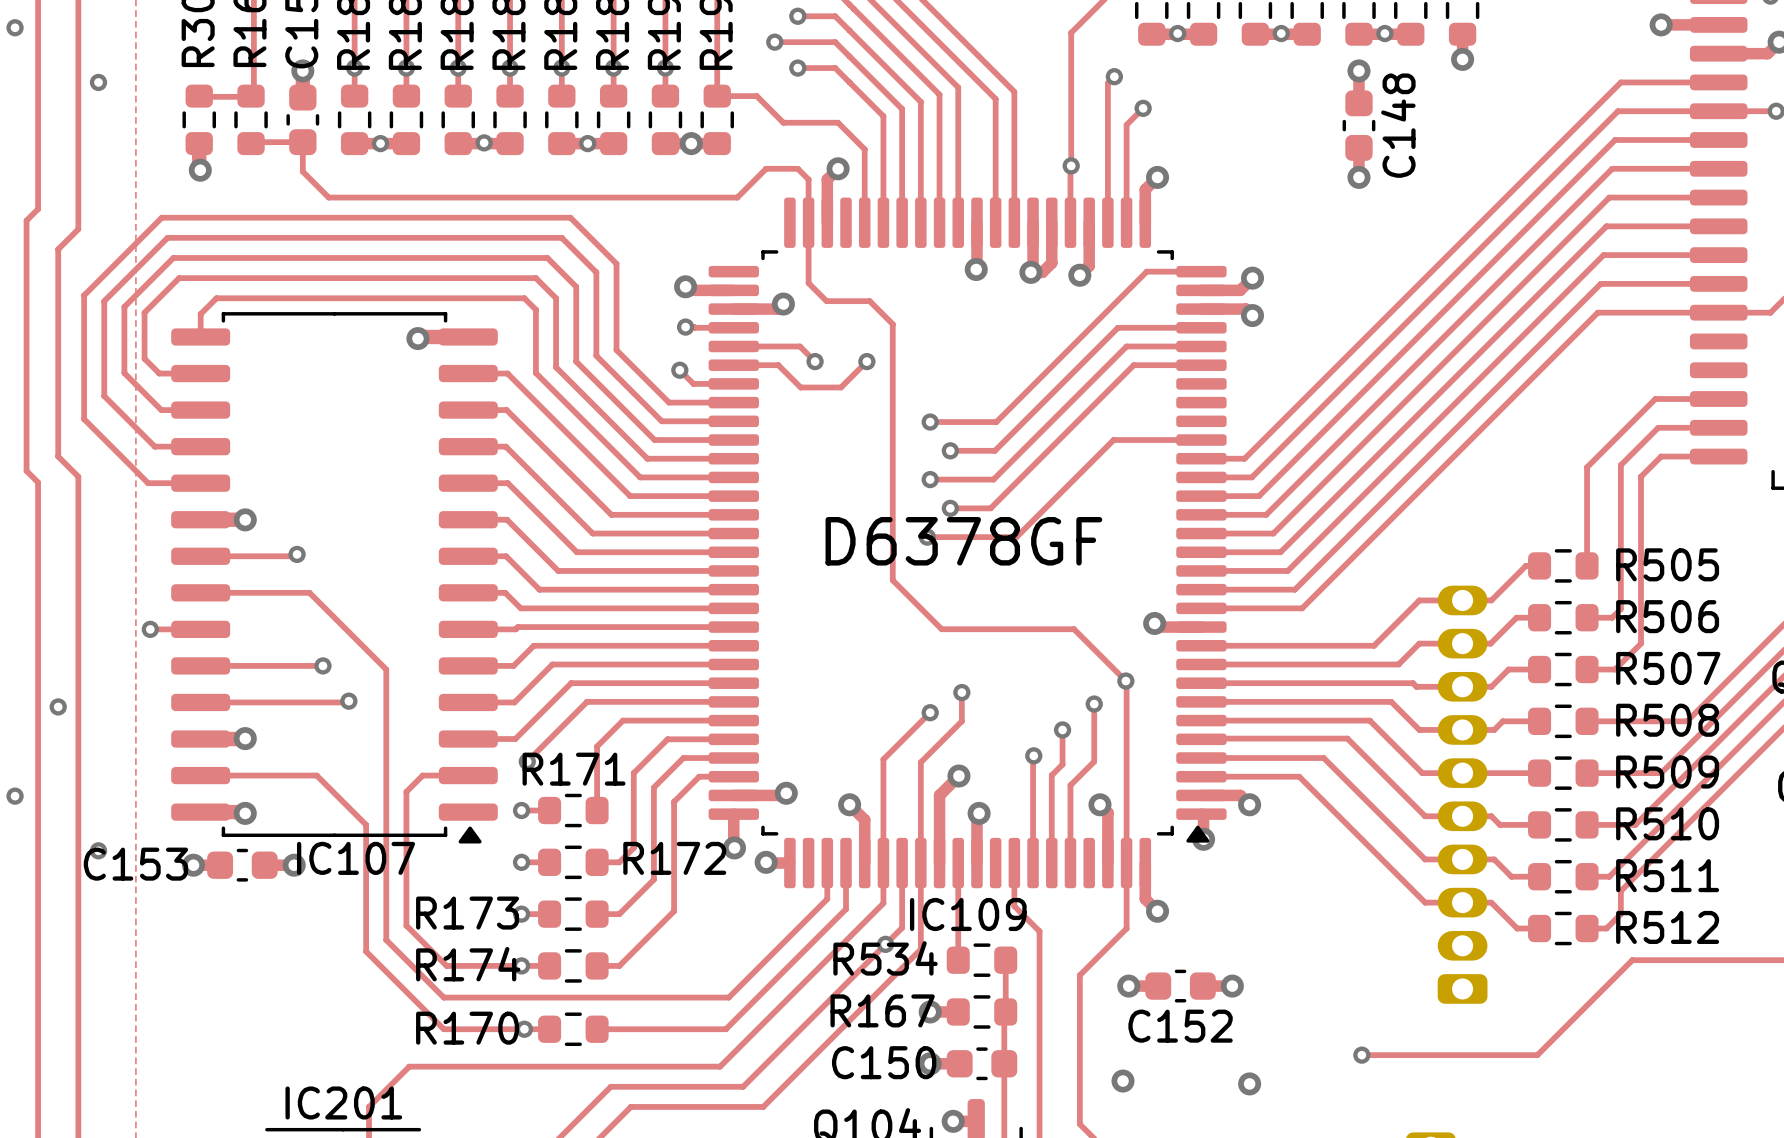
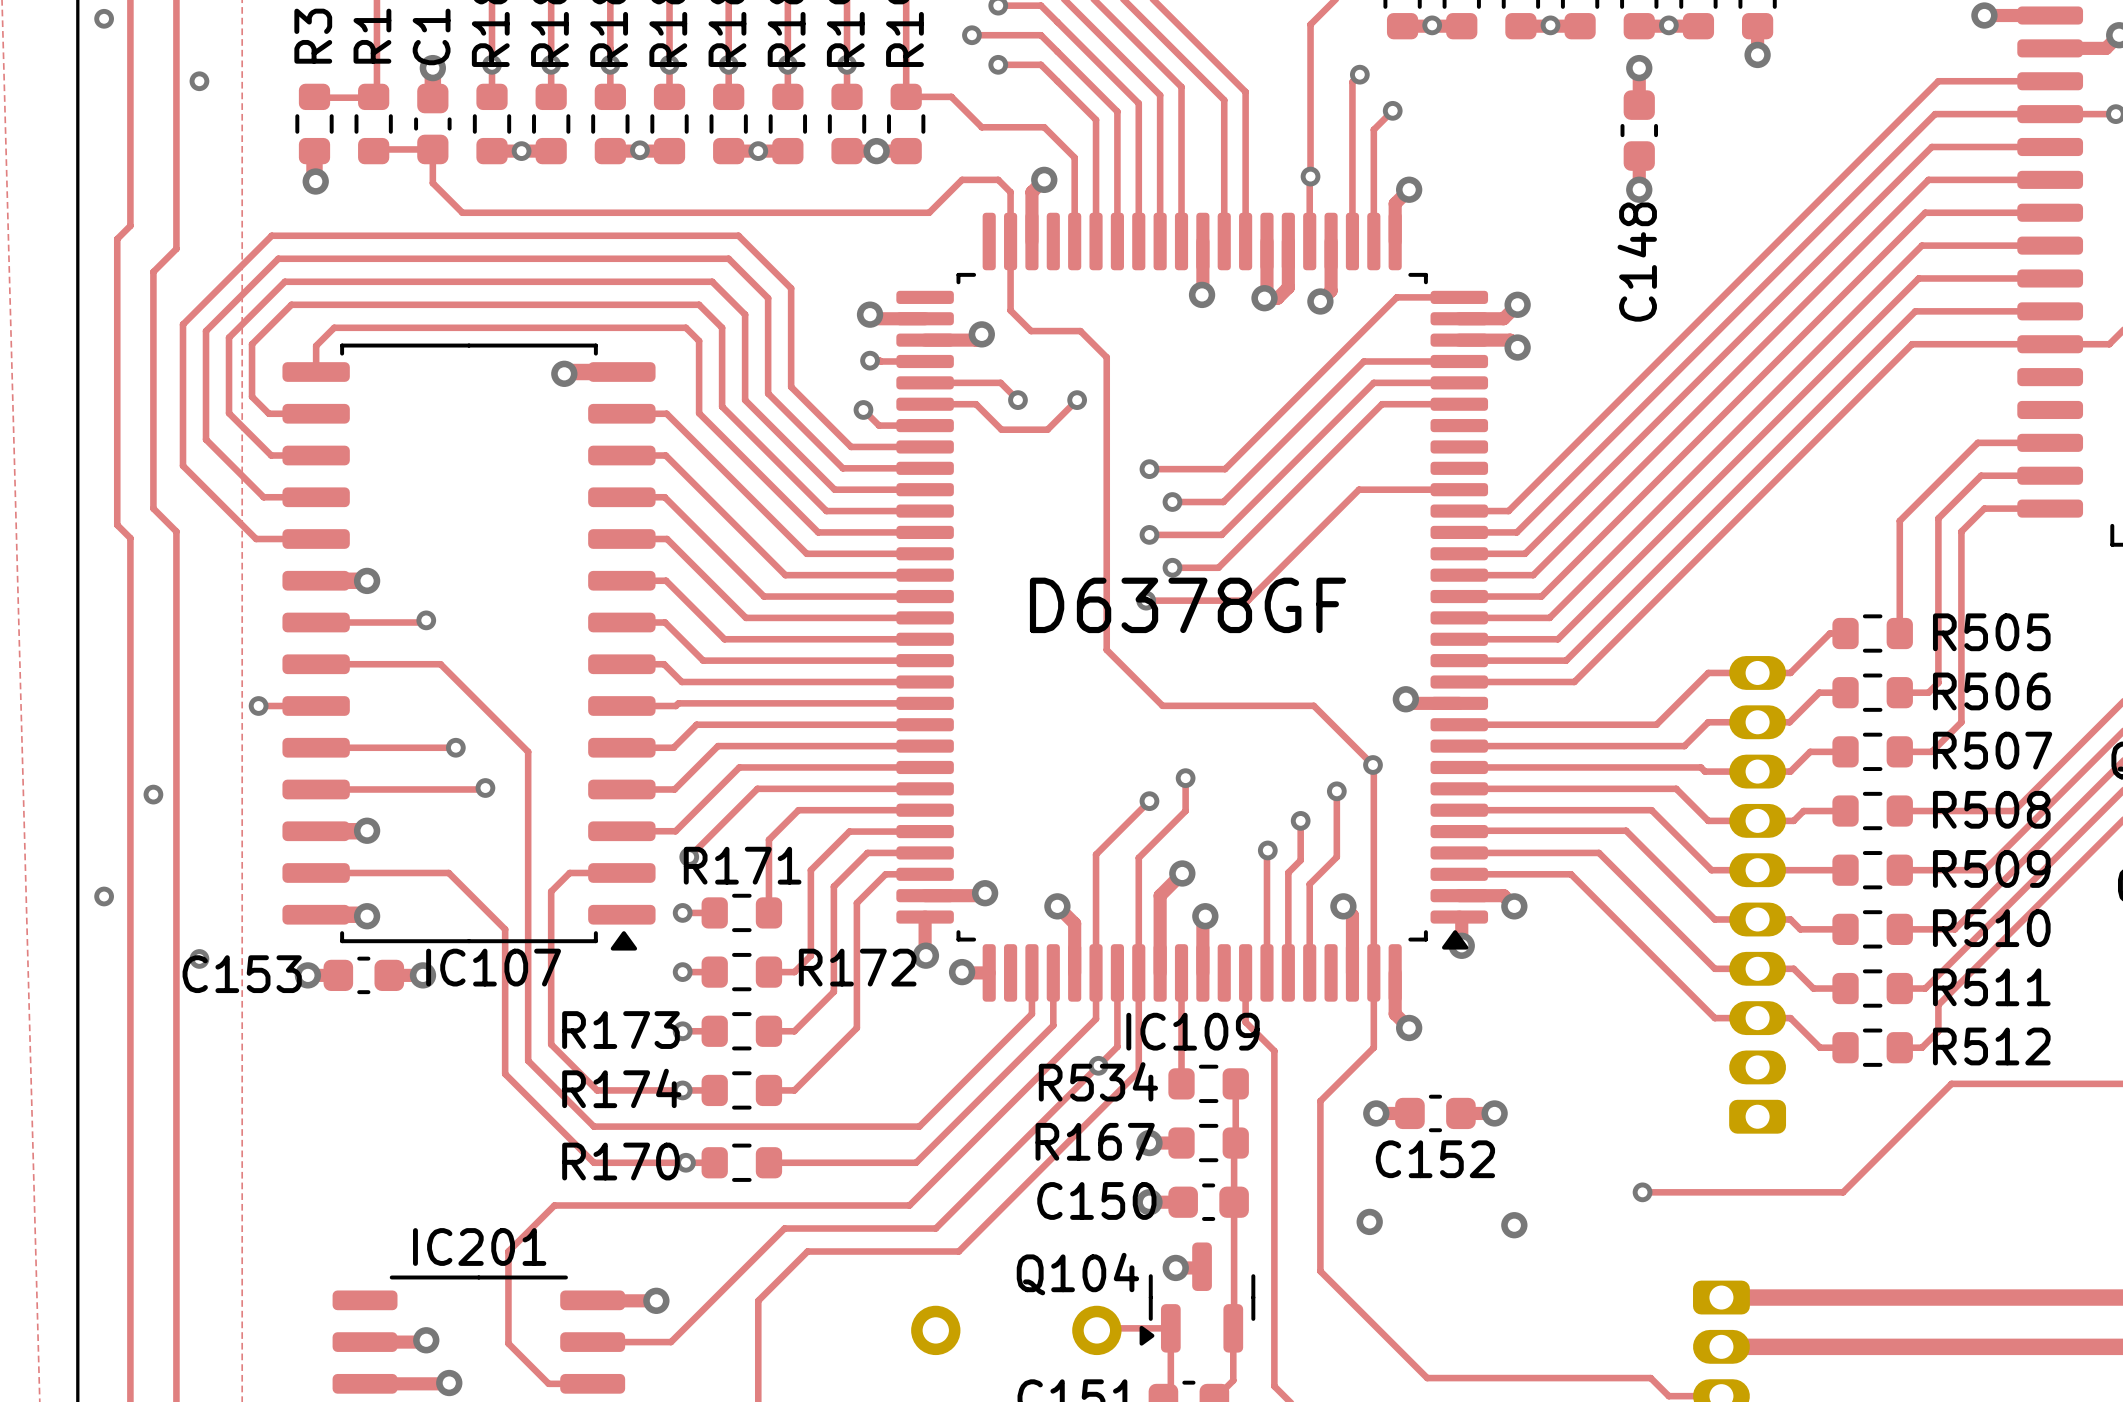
C148 name position: C148 (1398, 125) -> C148 (1637, 262)

